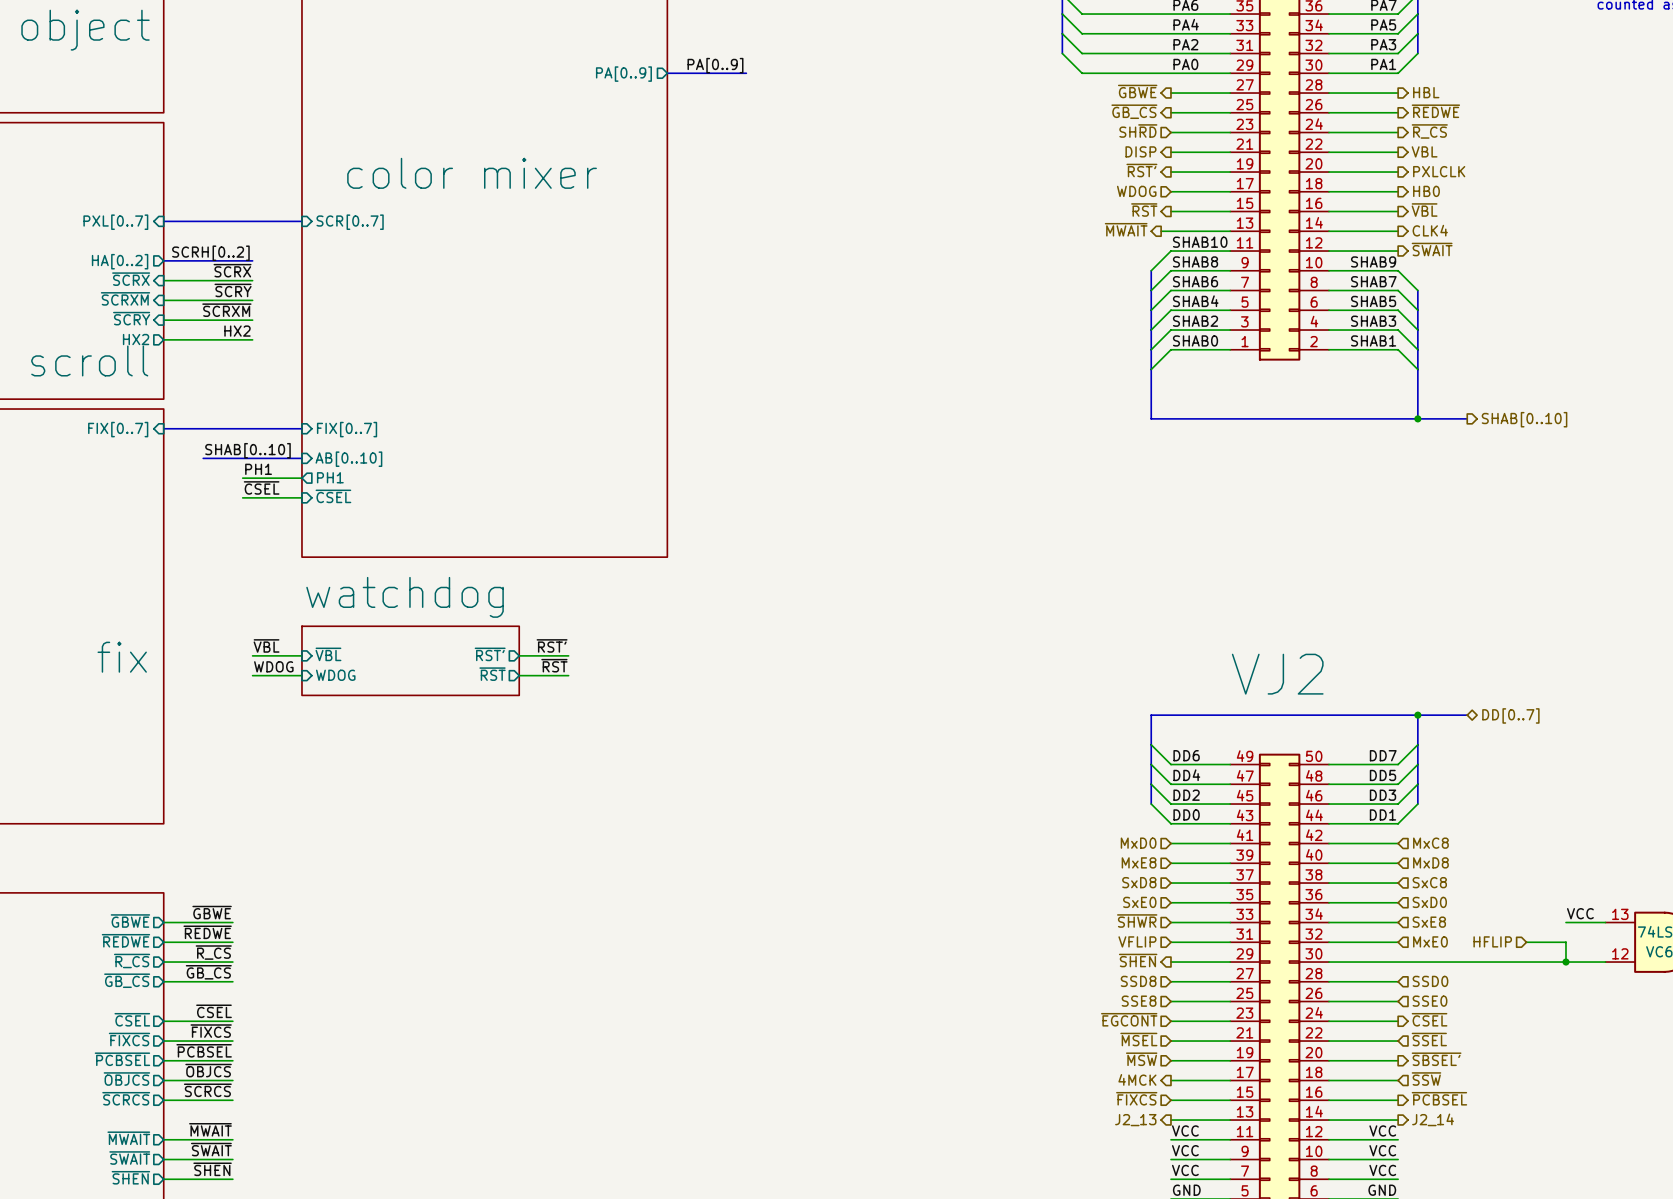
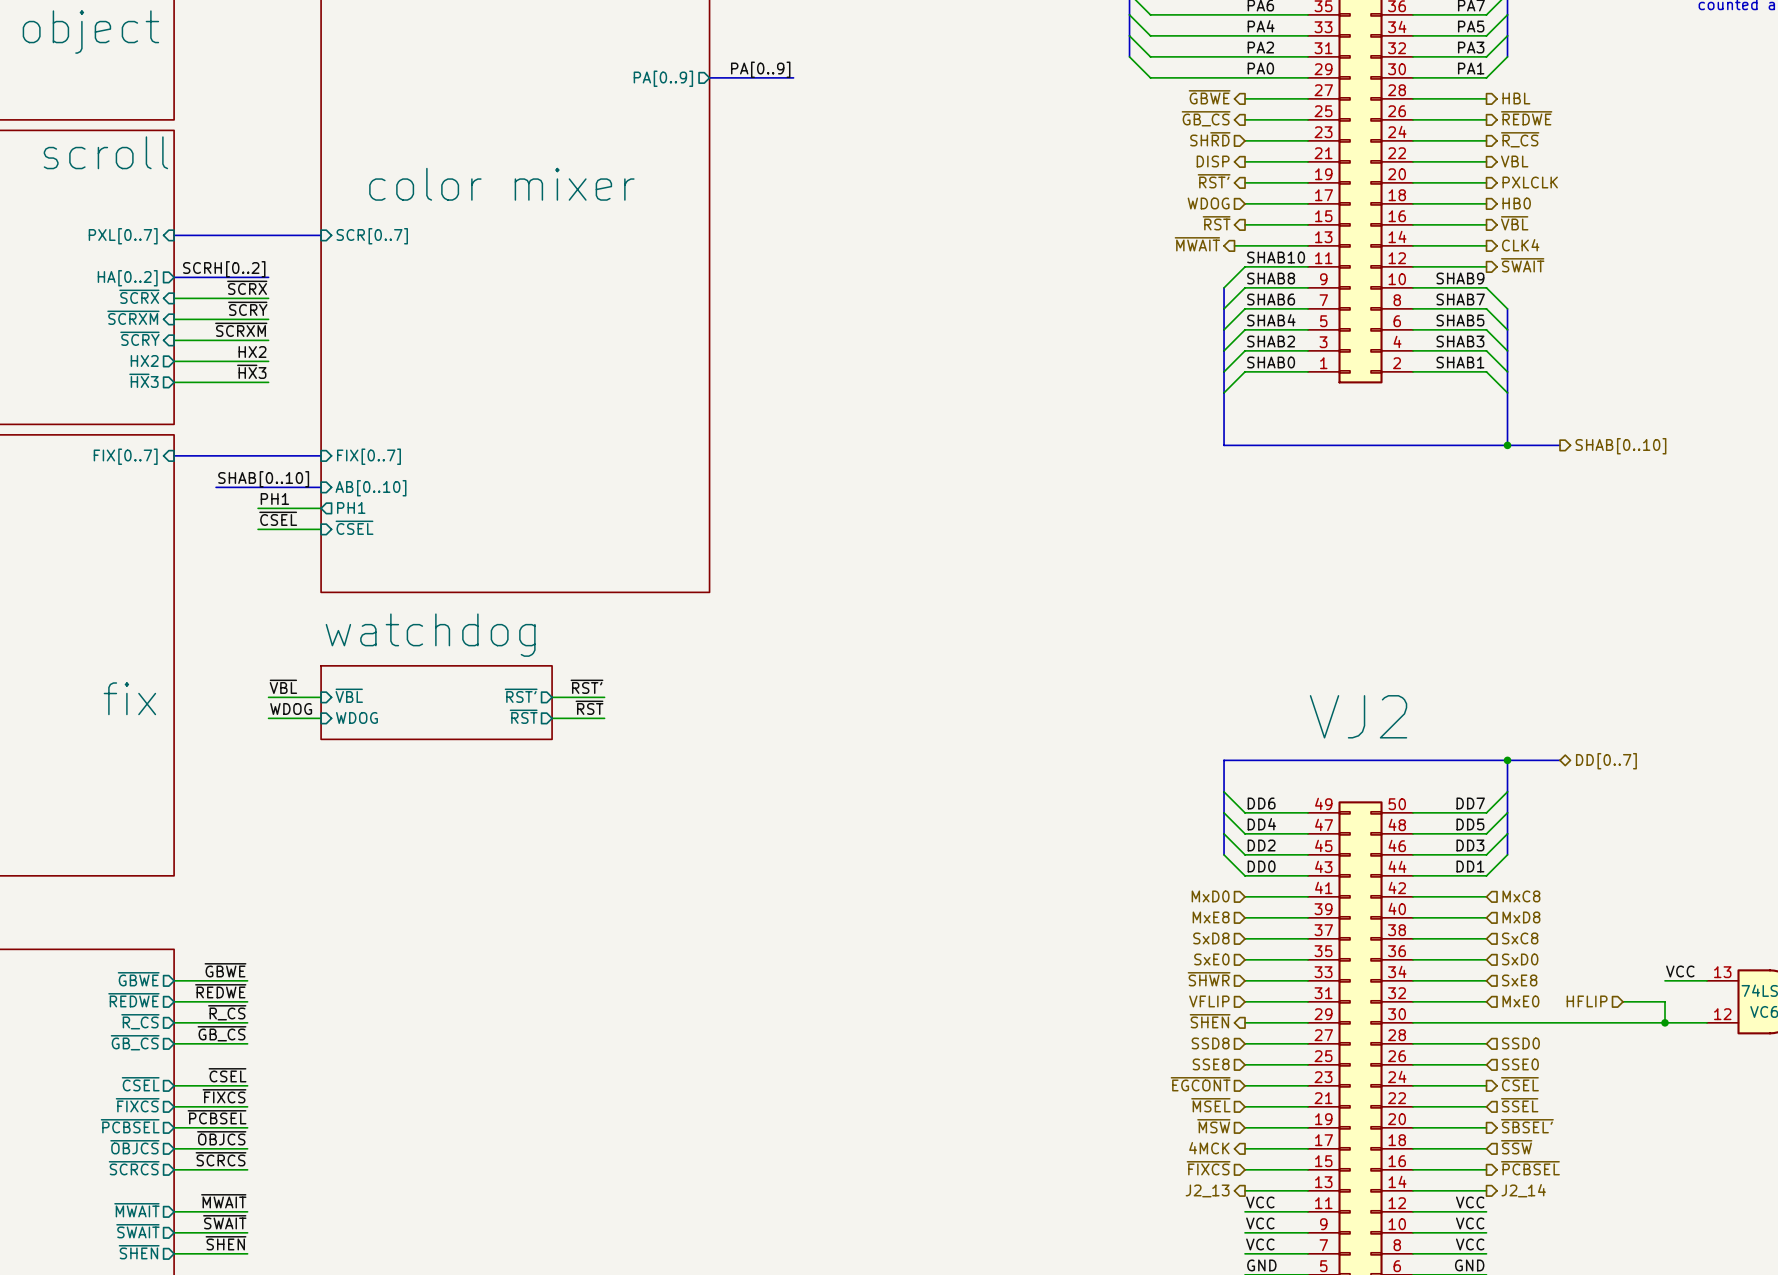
label: none -> ~{HX}3 (251, 371)
sheet pin: none -> ~{HX}3 (143, 380)
wire: none -> (174, 382) (268, 382)
sheet scroll name position: scroll (89, 360) -> scroll (105, 152)

